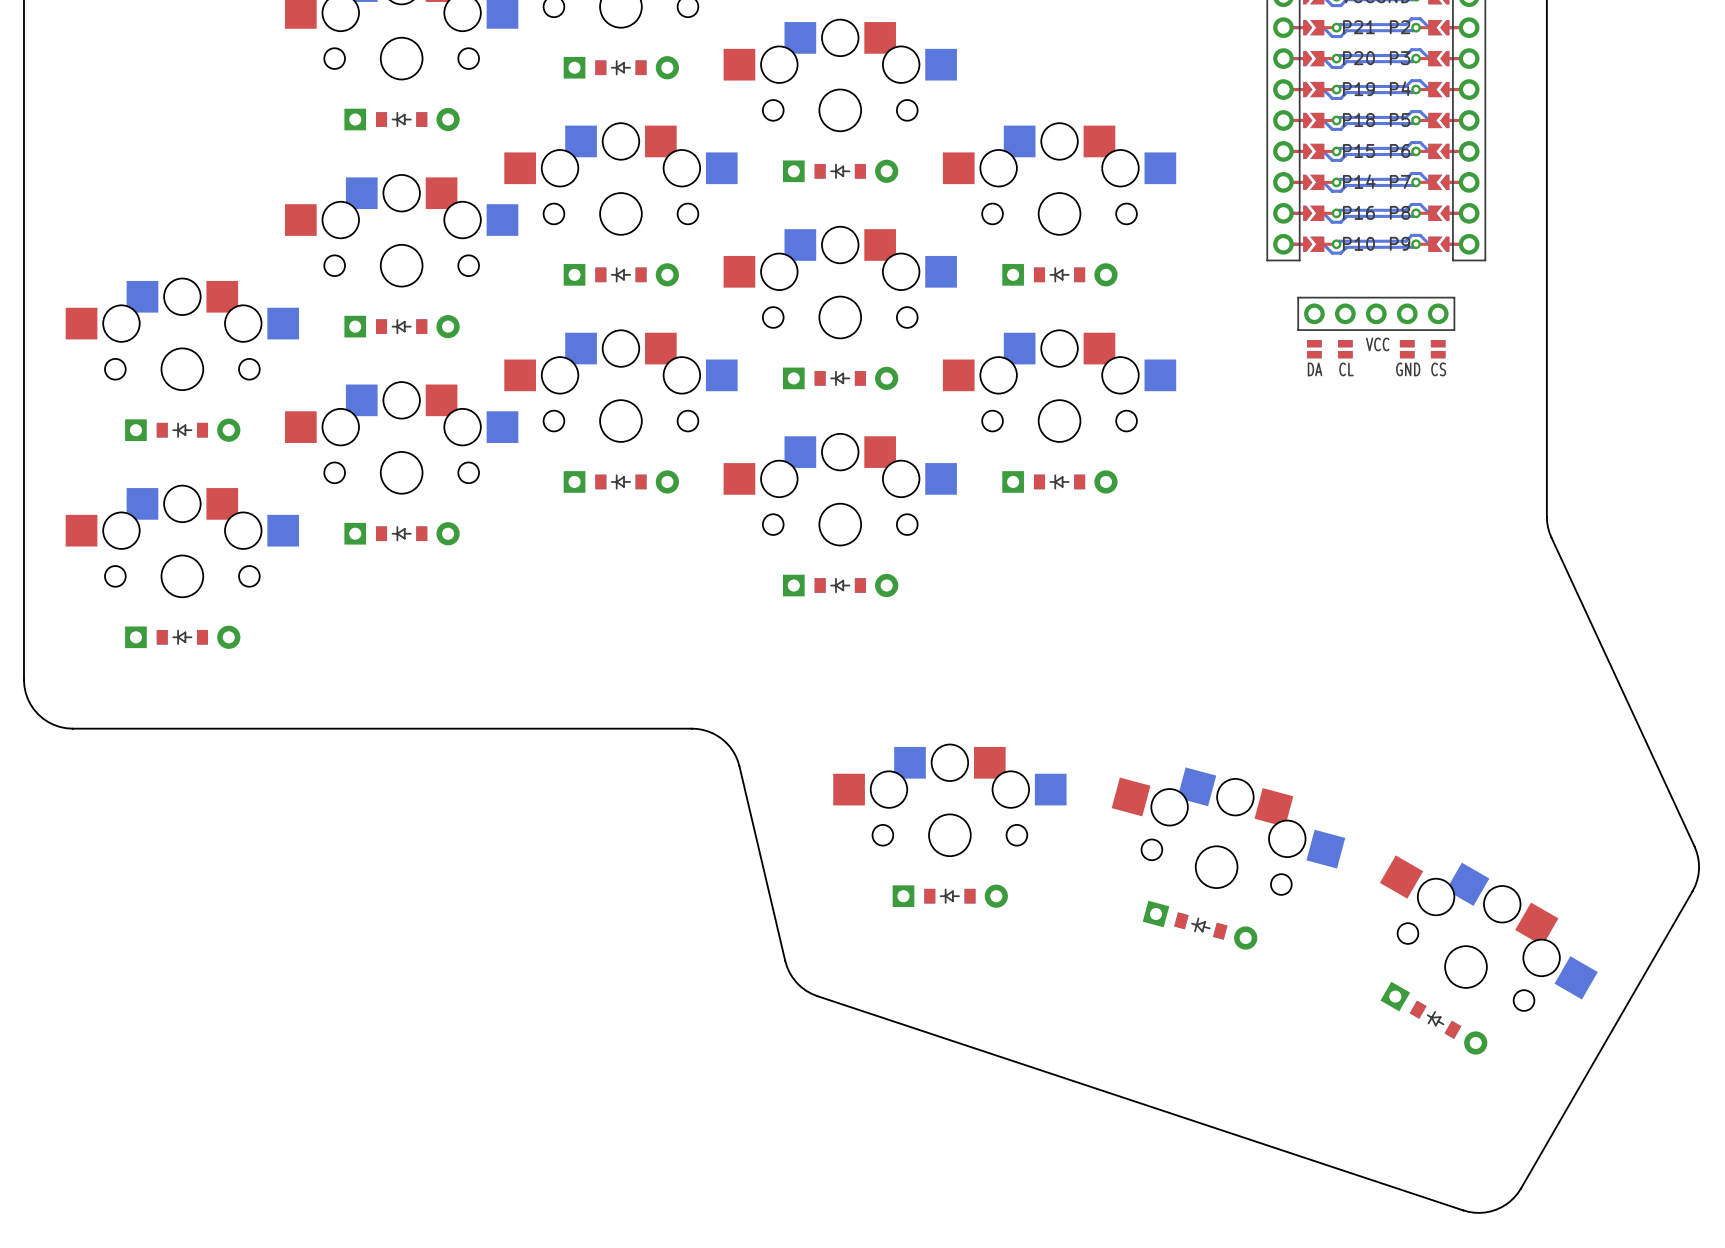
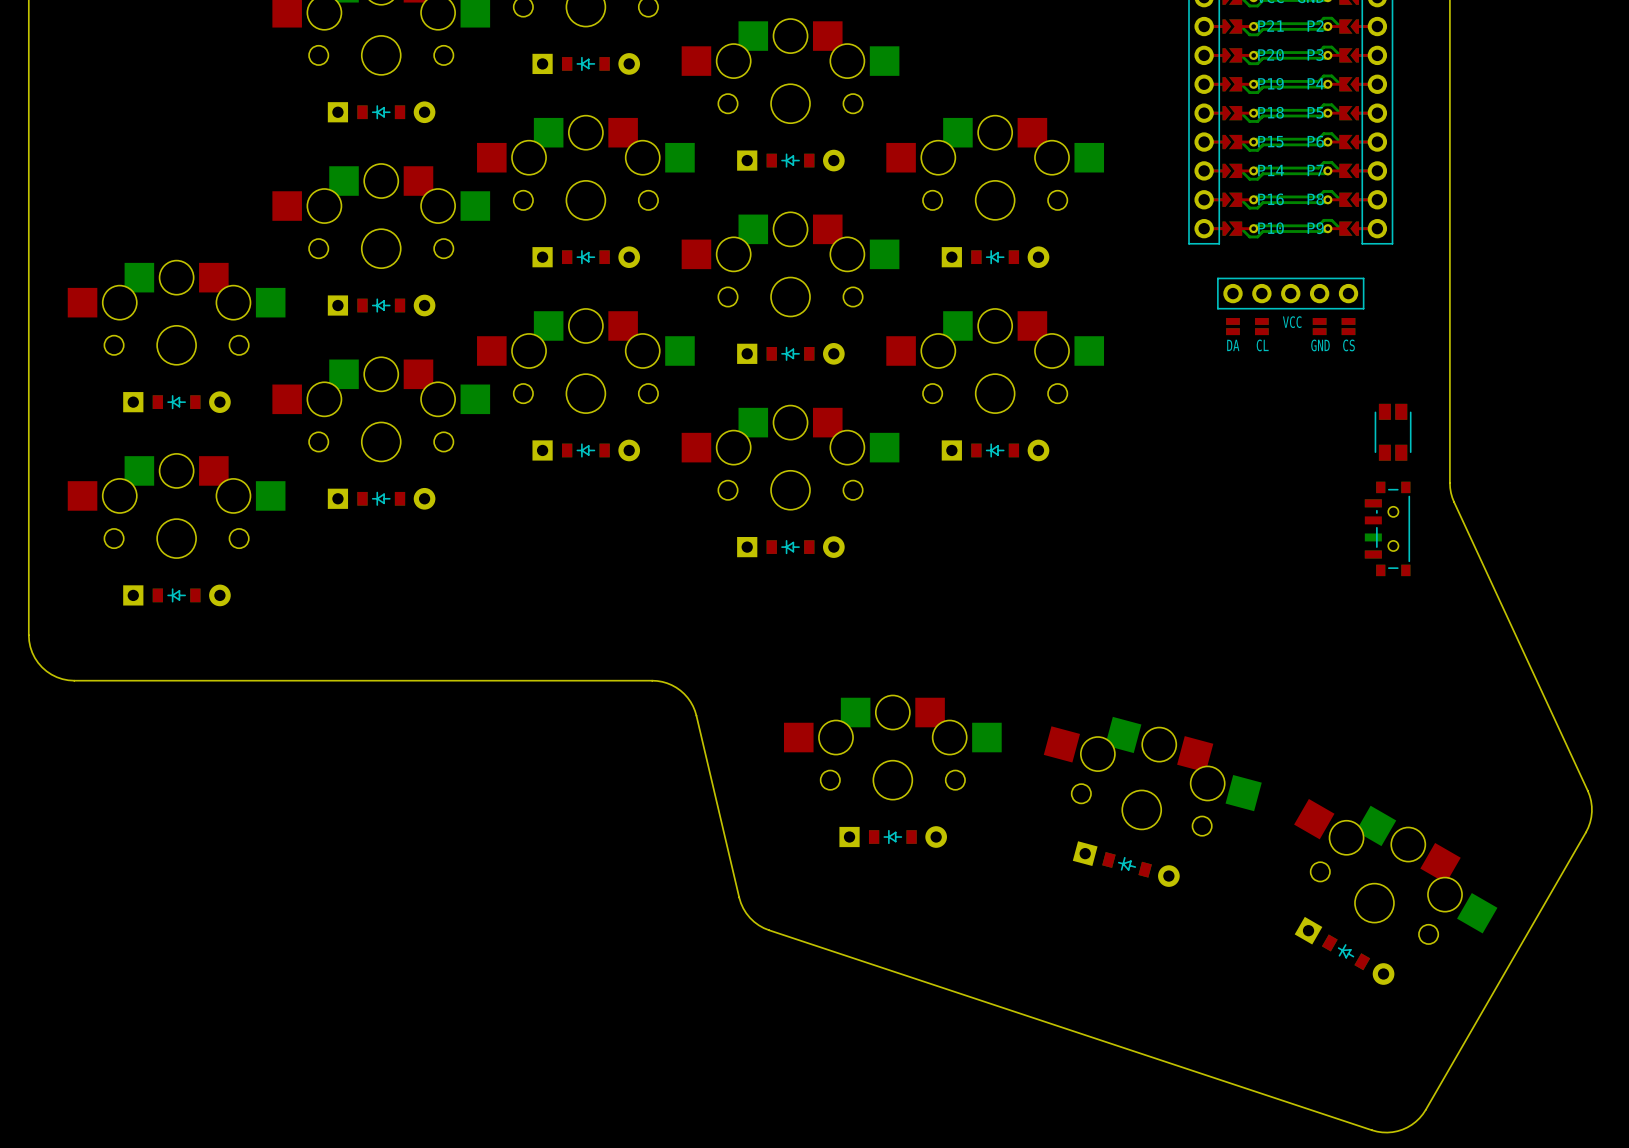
part: none -> (1393, 432)
part: none -> (1387, 528)

